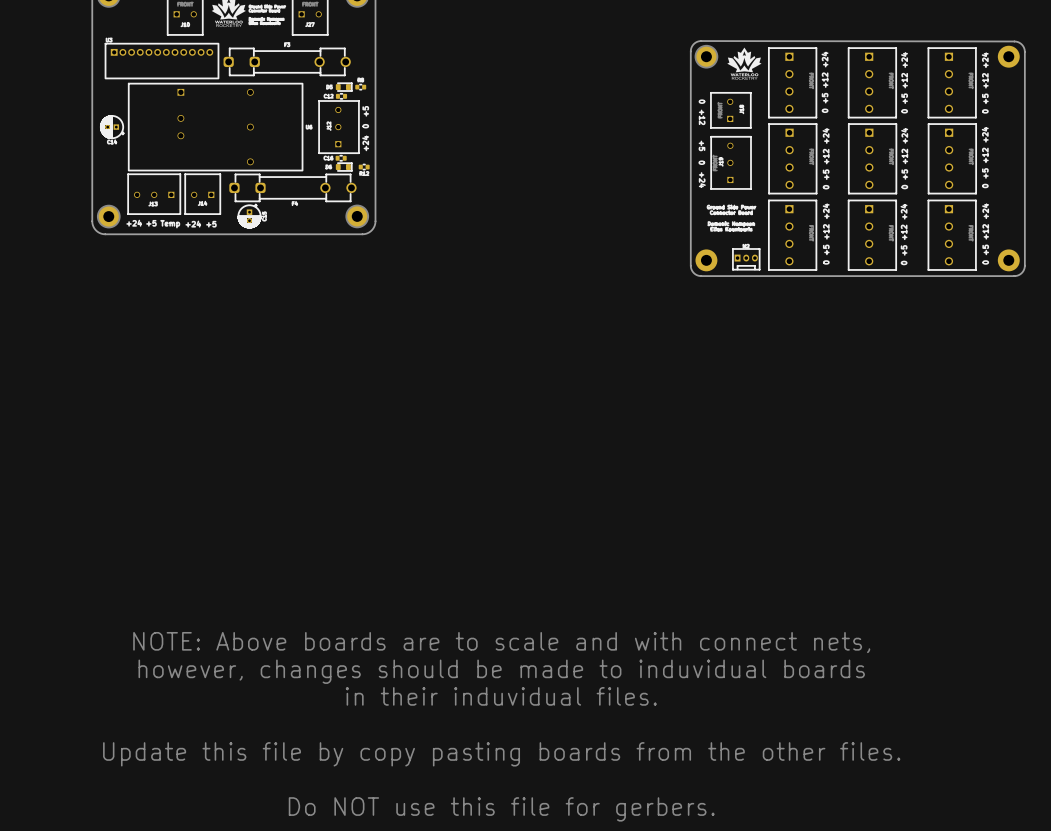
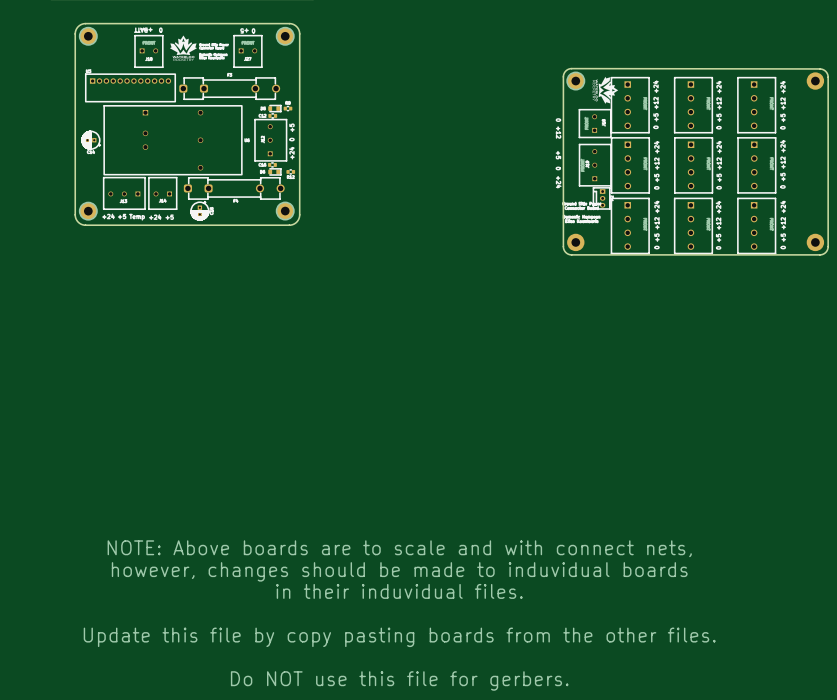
board edge: (701, 41) (1014, 41) (1020, 43) (1024, 51) (1024, 265) (1022, 272) (1014, 276) (701, 276) (694, 273) (690, 265) (690, 51) (693, 44) (701, 41) -> (571, 68) (819, 68) (824, 70) (828, 77) (828, 246) (826, 251) (819, 254) (571, 254) (566, 253) (563, 246) (563, 76) (565, 71) (571, 68)
drawing: [727, 47, 762, 80] -> none
drawing: none -> [592, 76, 619, 104]
part position: (706, 56) -> (575, 81)
part position: (1008, 56) -> (815, 81)
part position: (730, 110) -> (595, 123)
part position: (731, 162) -> (595, 165)
part rotation: 0° (746, 259) -> 90° clockwise (601, 198)
part position: (746, 259) -> (601, 198)
part position: (706, 260) -> (575, 242)
part position: (1008, 260) -> (815, 242)

